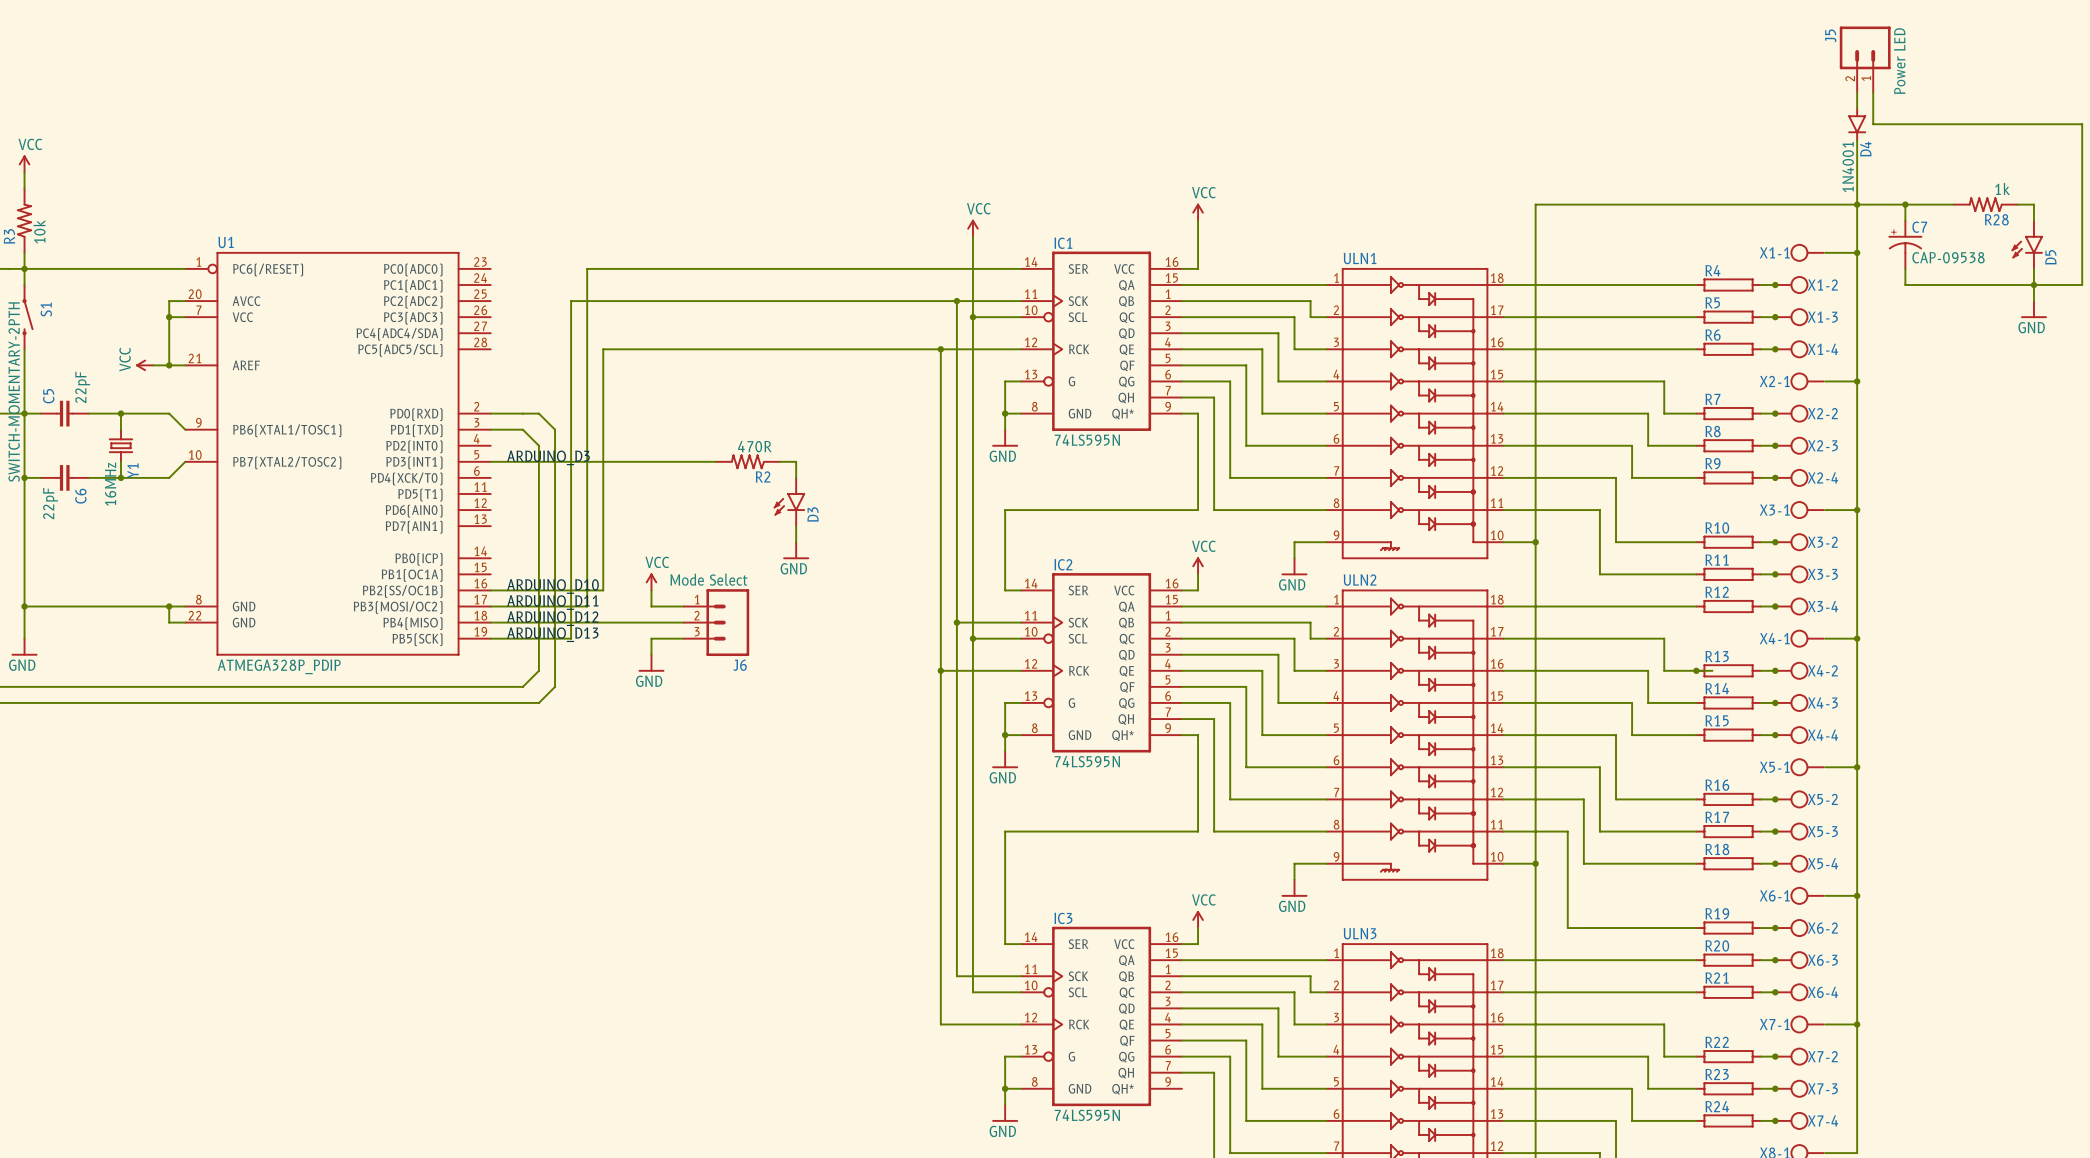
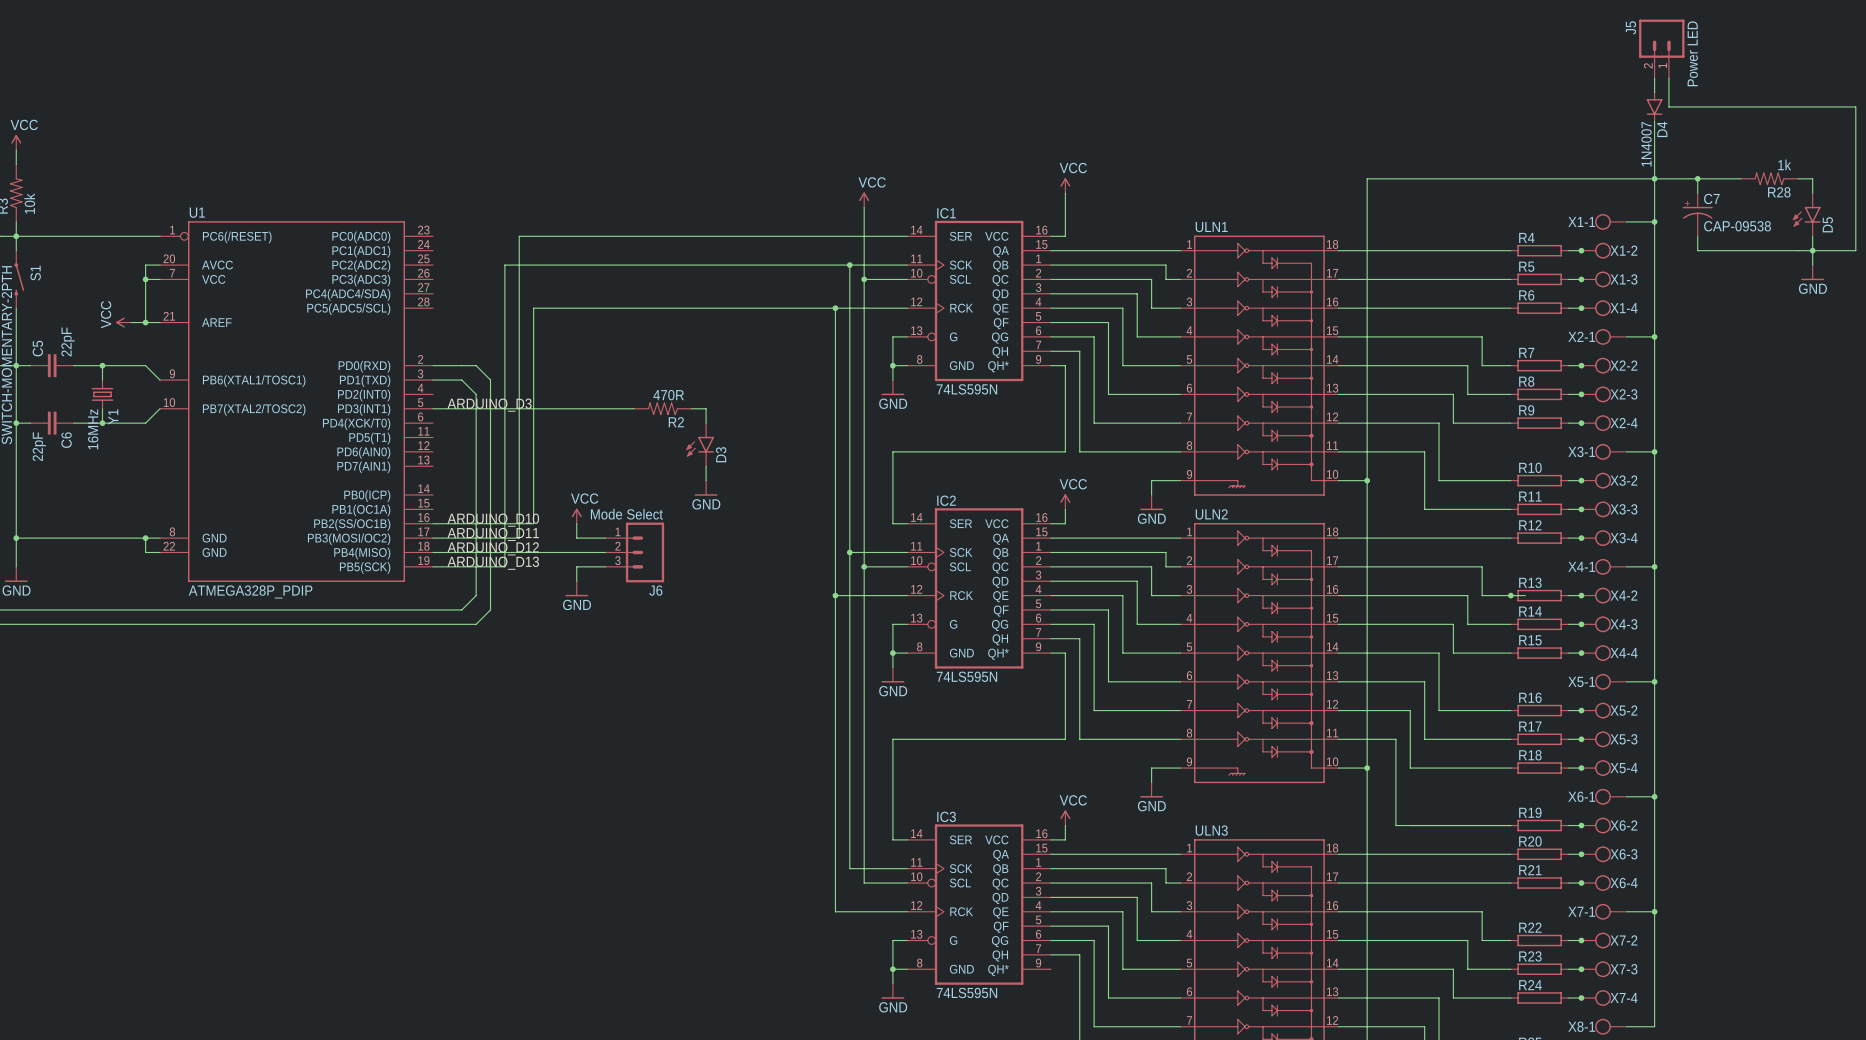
D4 value: 1N4001 (1848, 167) -> 1N4007 (1646, 144)

